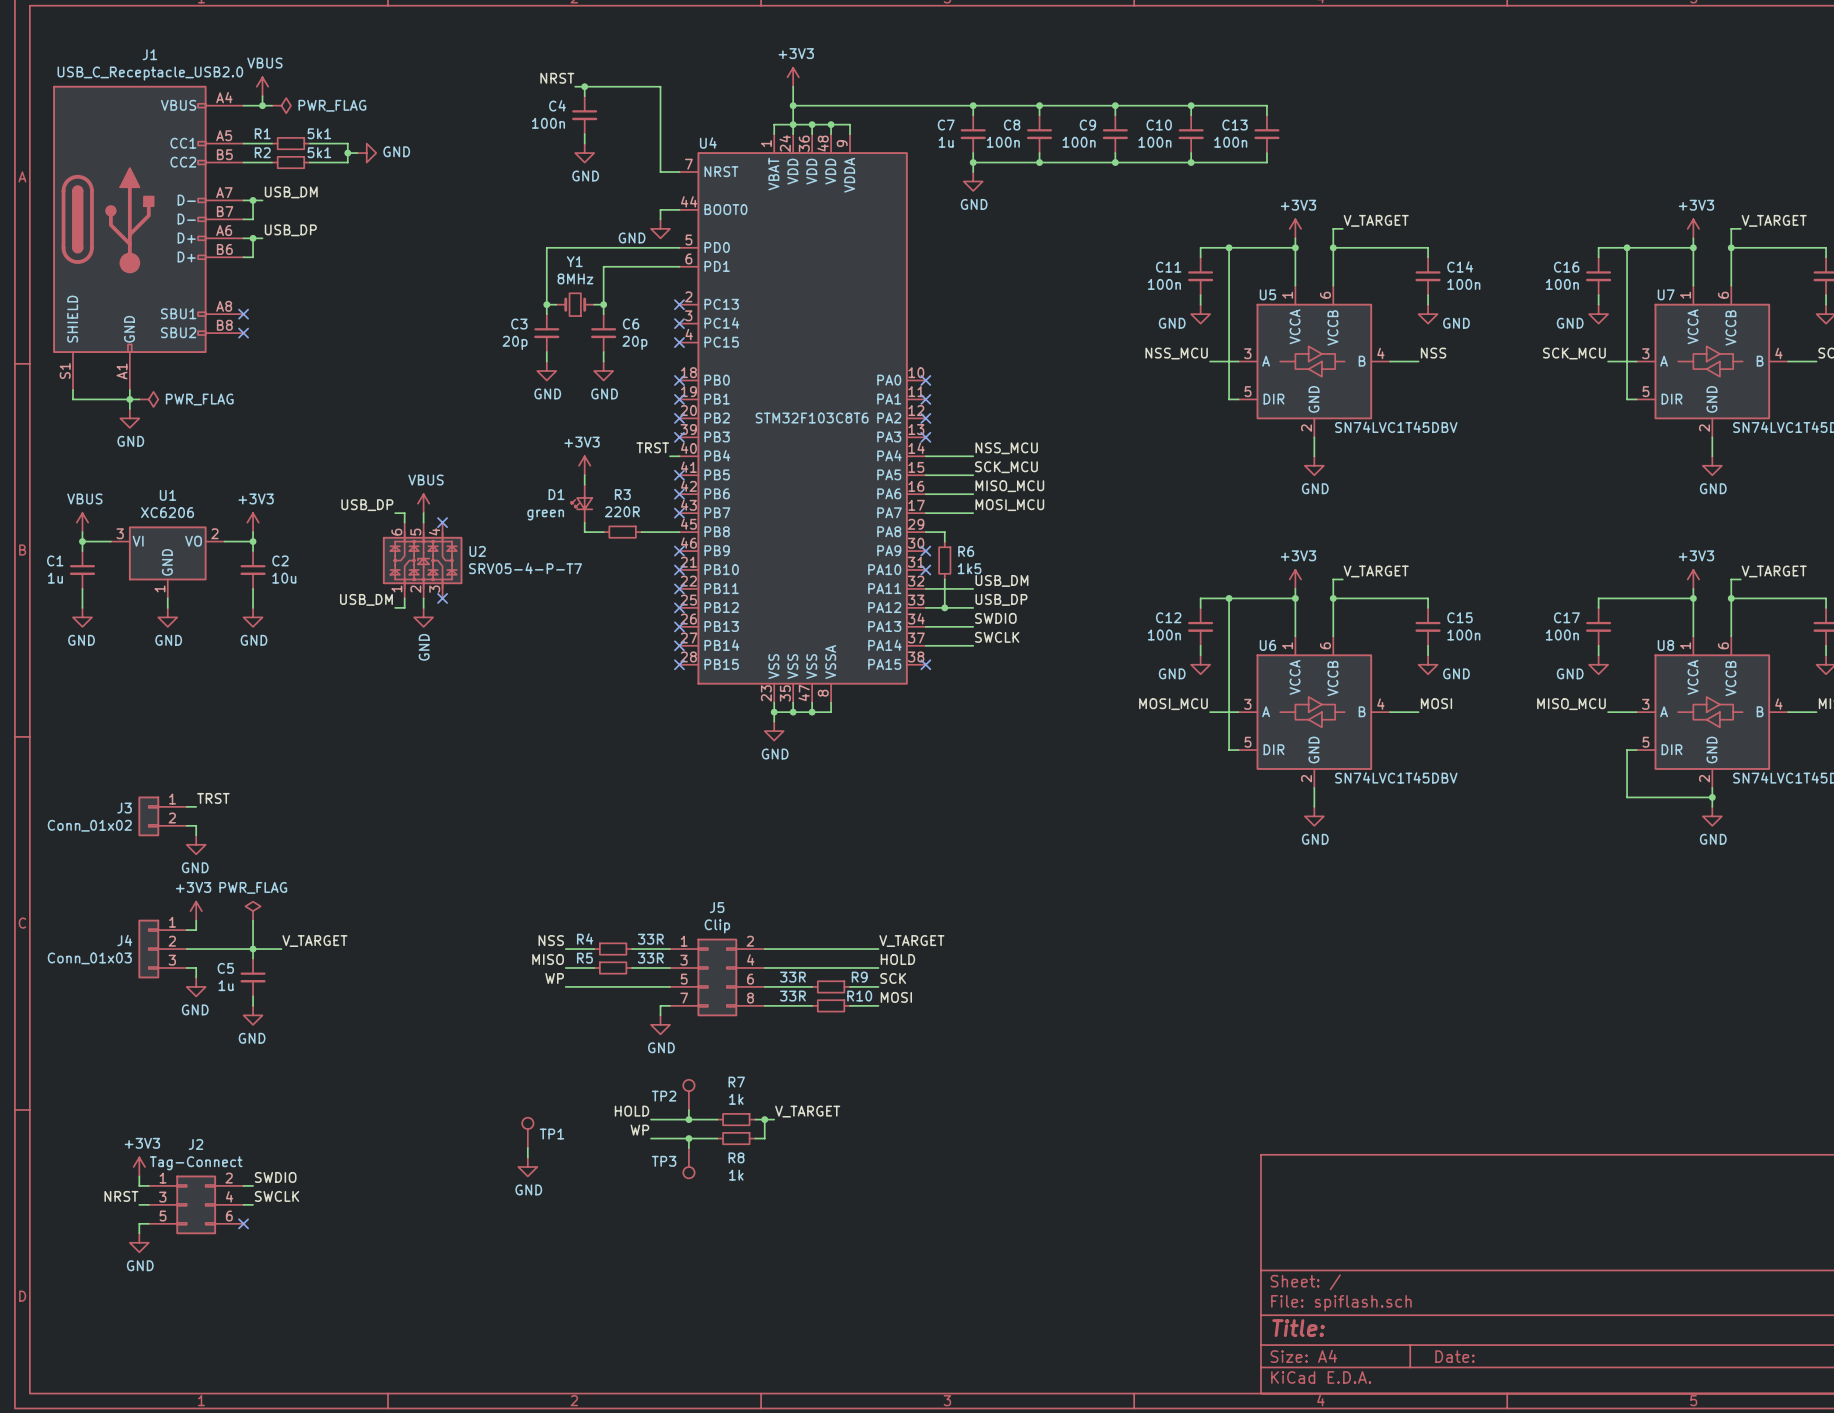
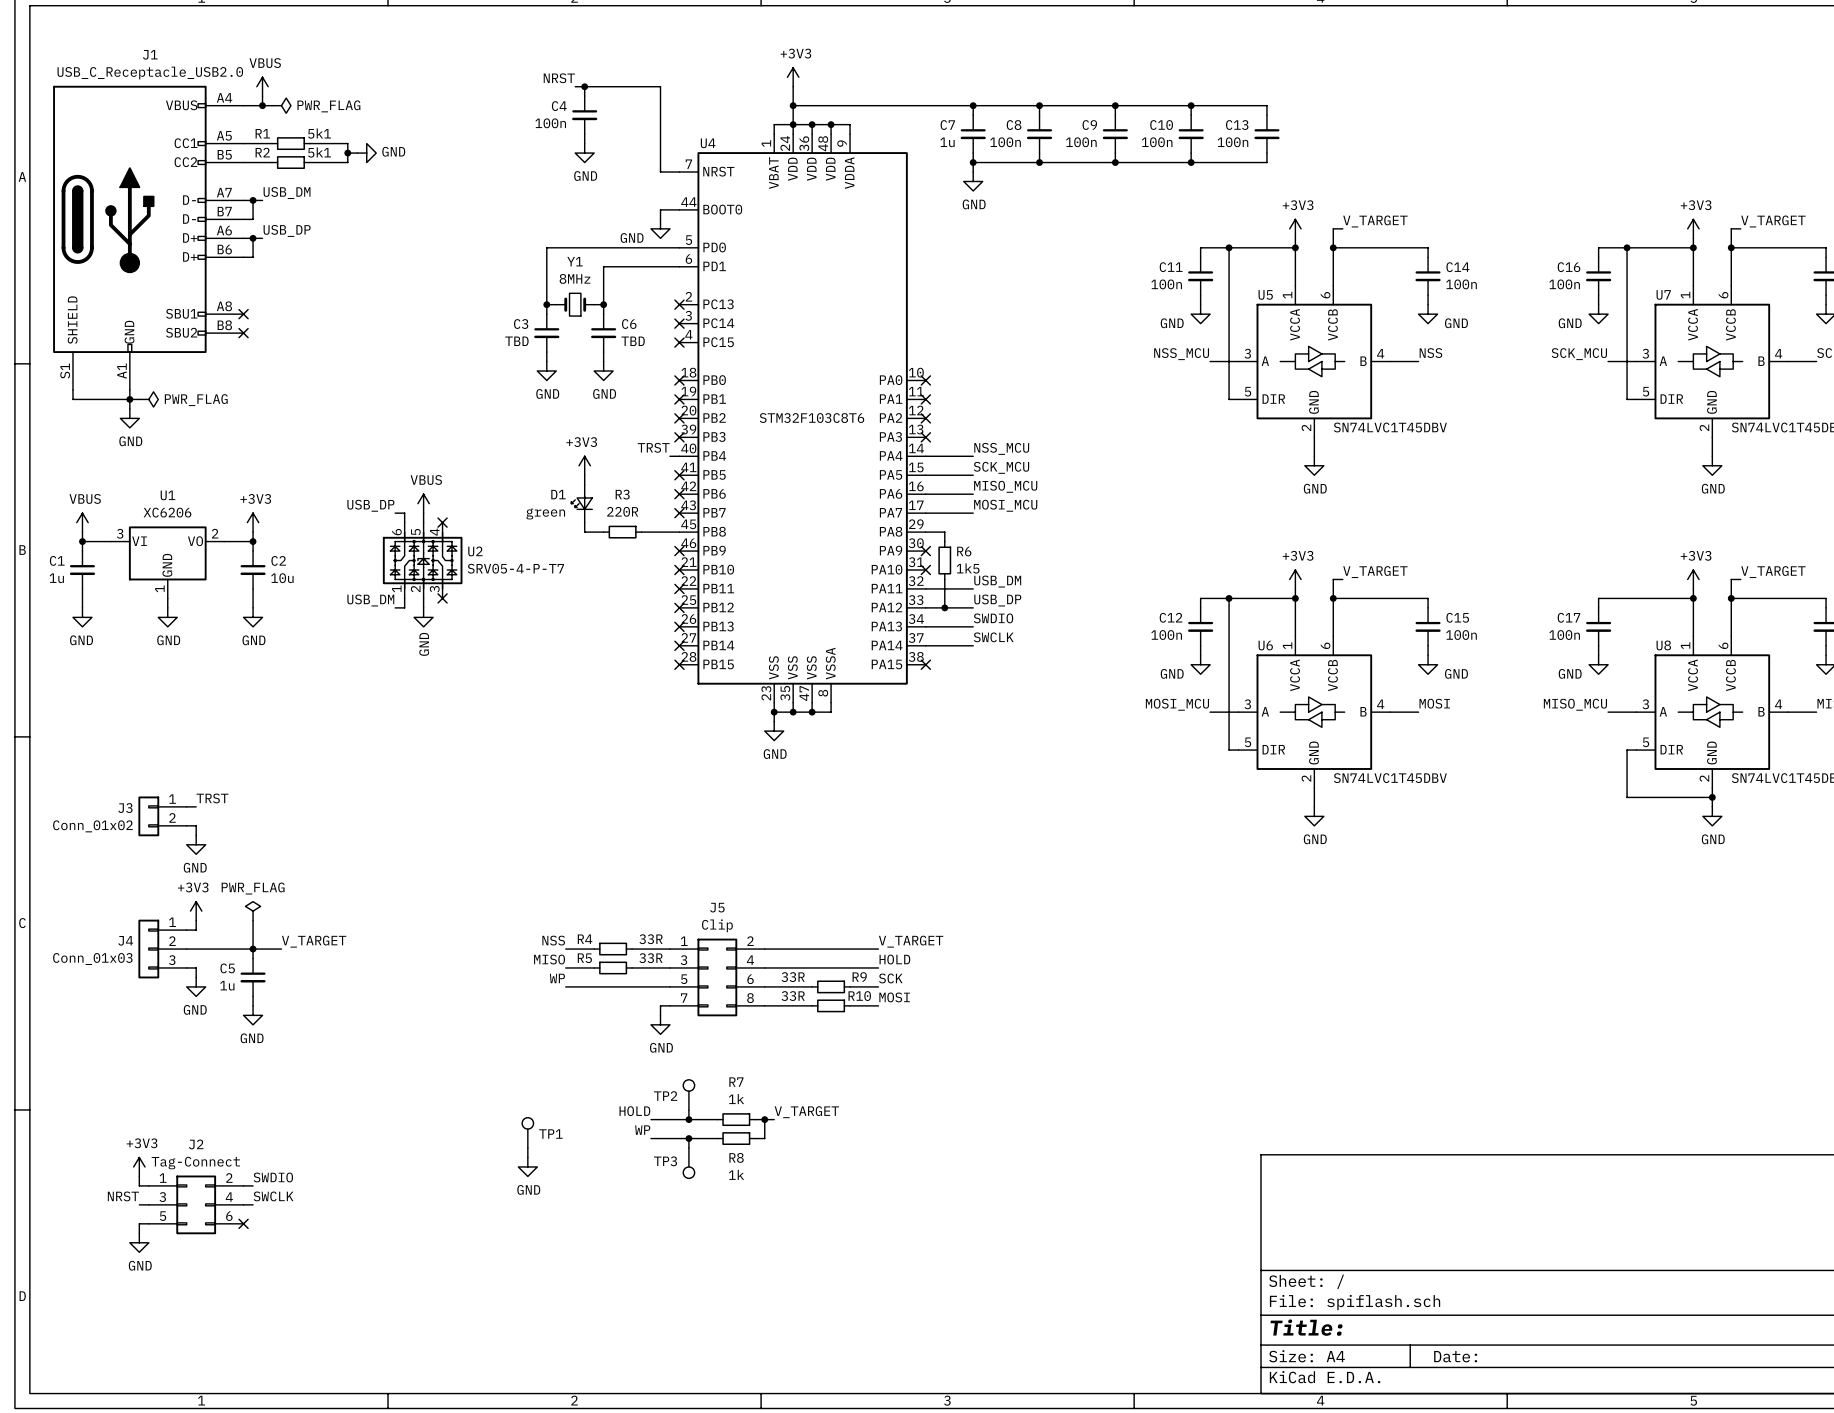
C3 value: 20p (515, 342) -> TBD (516, 341)
C6 value: 20p (634, 342) -> TBD (633, 341)

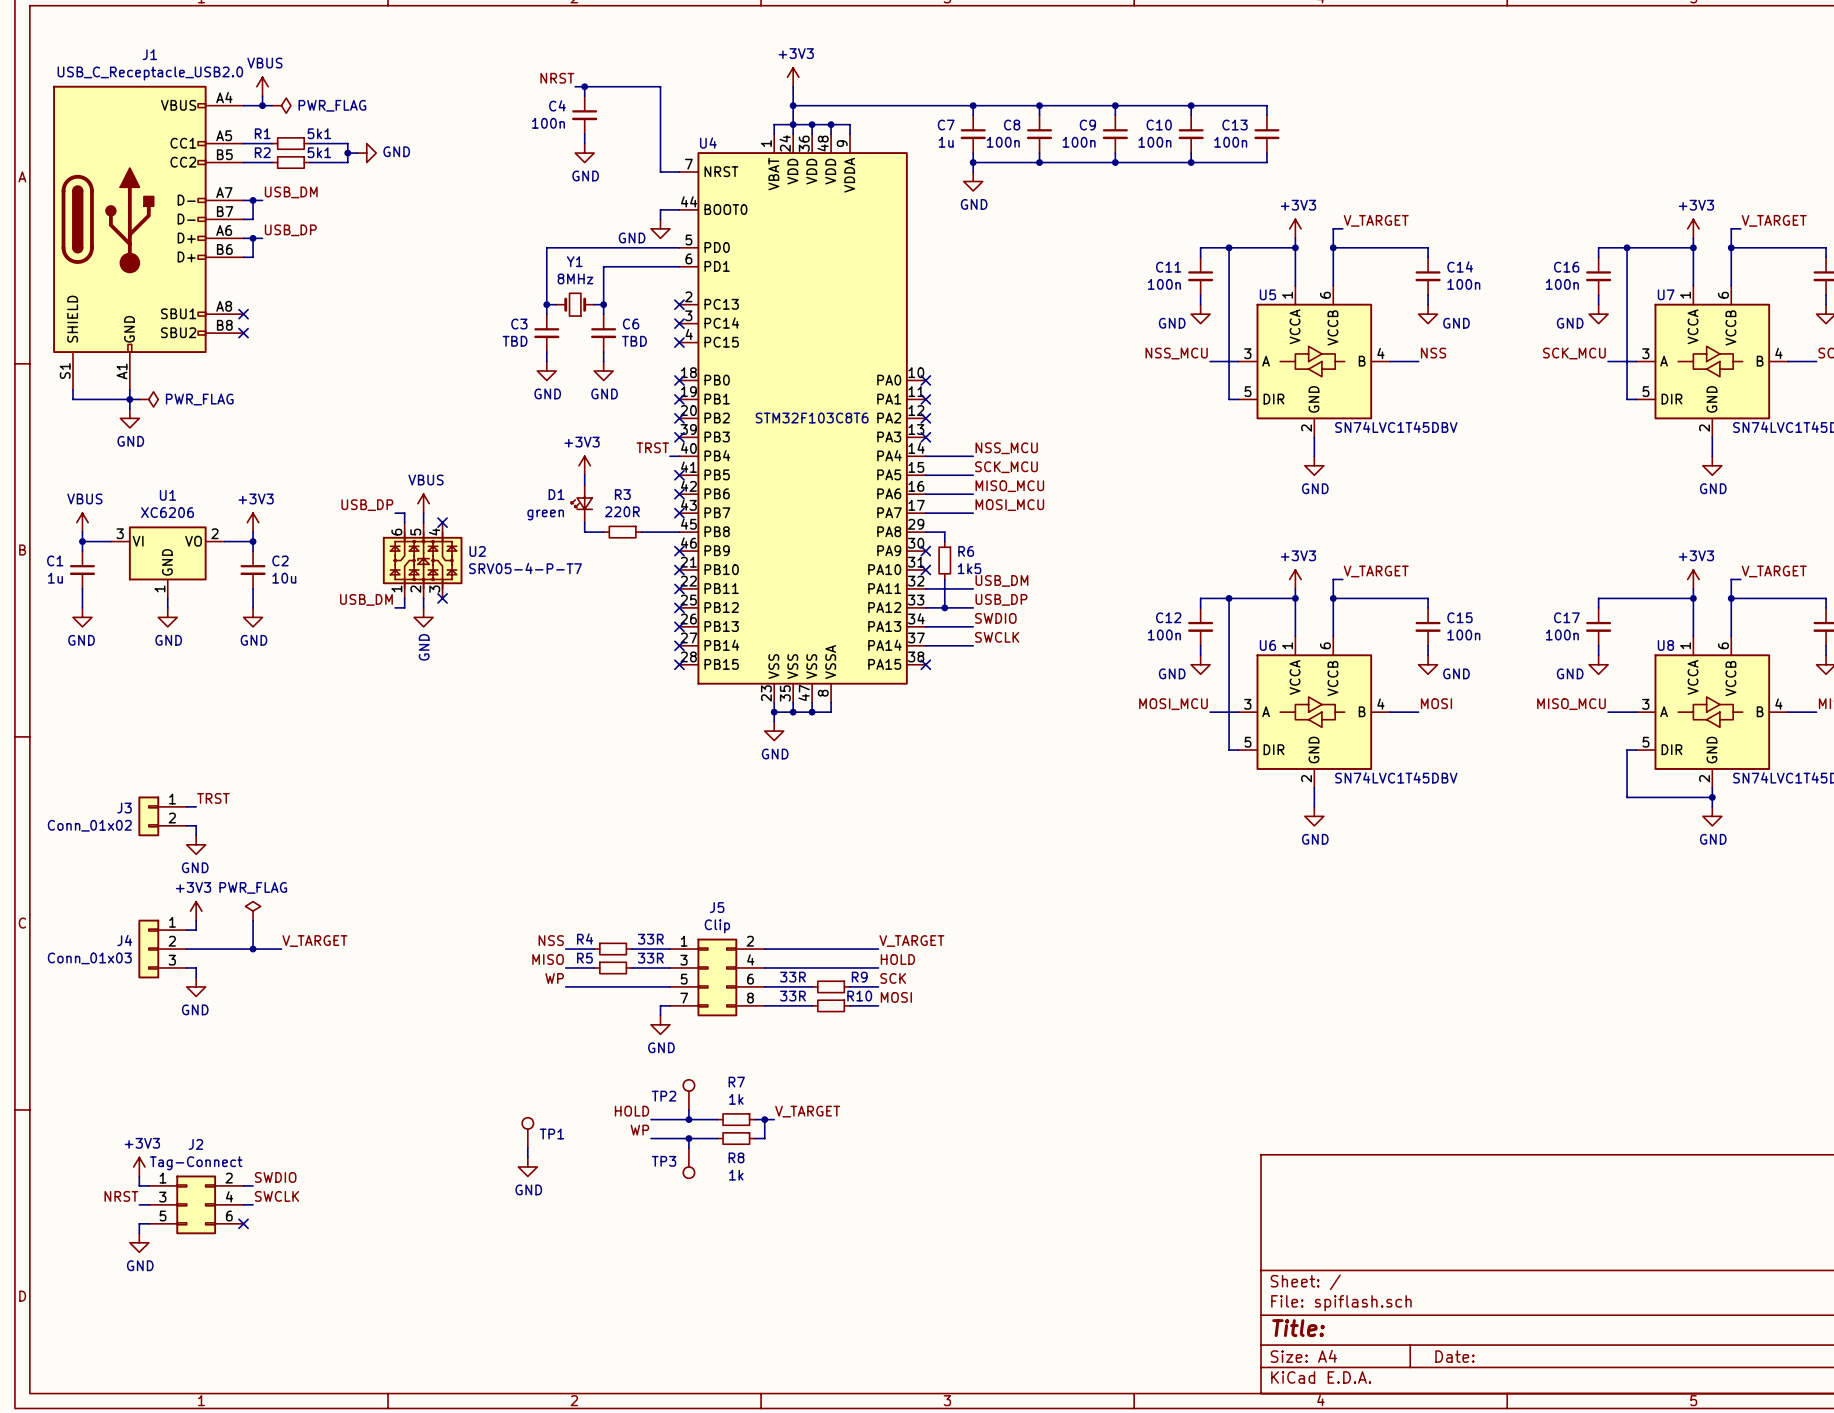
wire: (253, 949) (253, 958) -> none
C5: 1u (253, 977) -> none
wire: (253, 996) (253, 1005) -> none
power symbol: GND (253, 1015) -> none

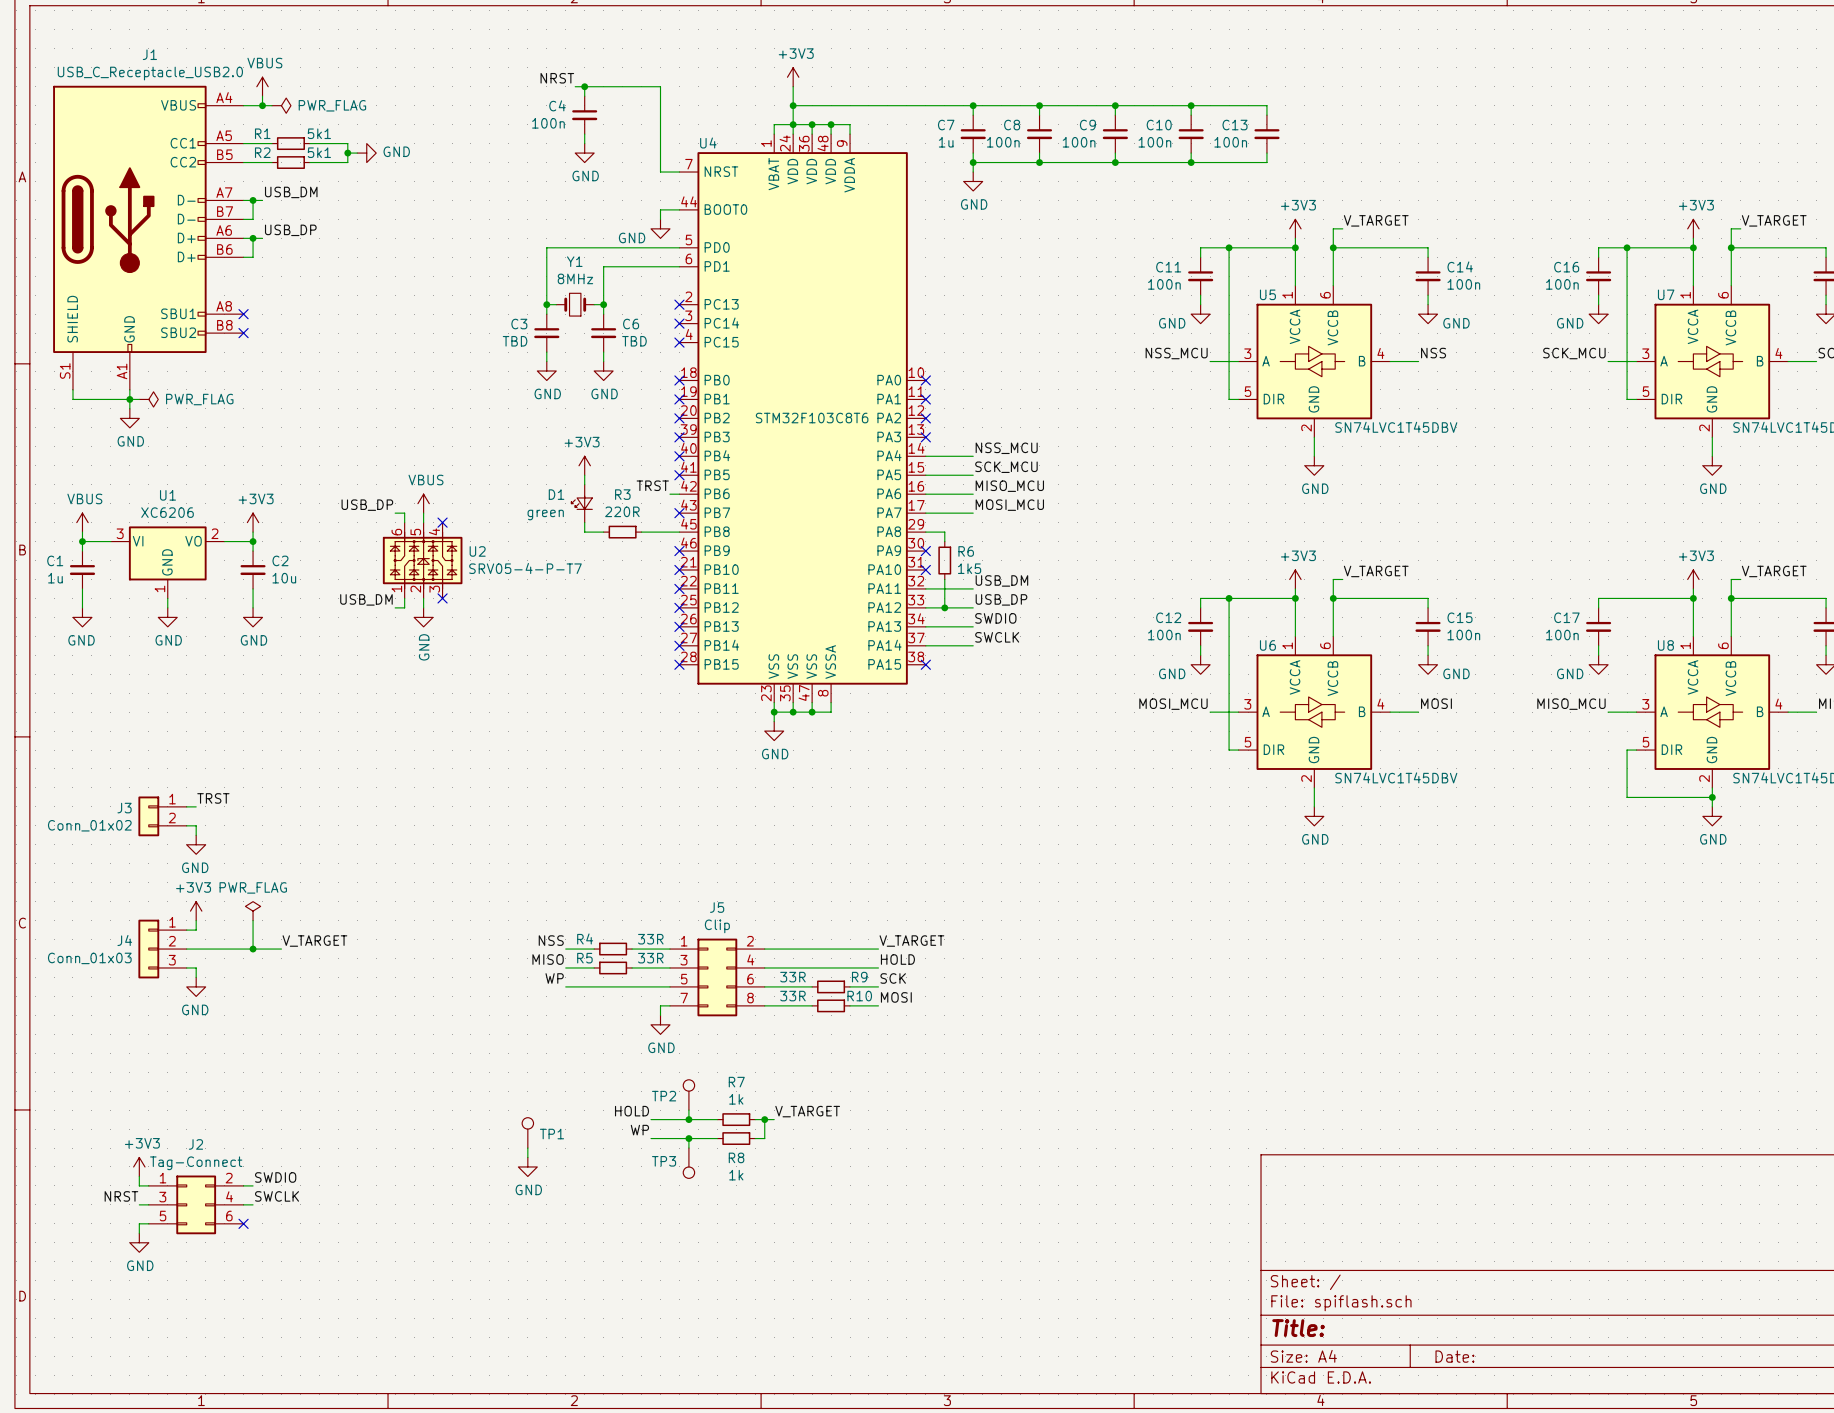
label position: TRST (652, 447) -> TRST (652, 485)
wire: (669, 456) (679, 456) -> (669, 494) (679, 494)
no-connect mark position: (679, 494) -> (679, 456)

